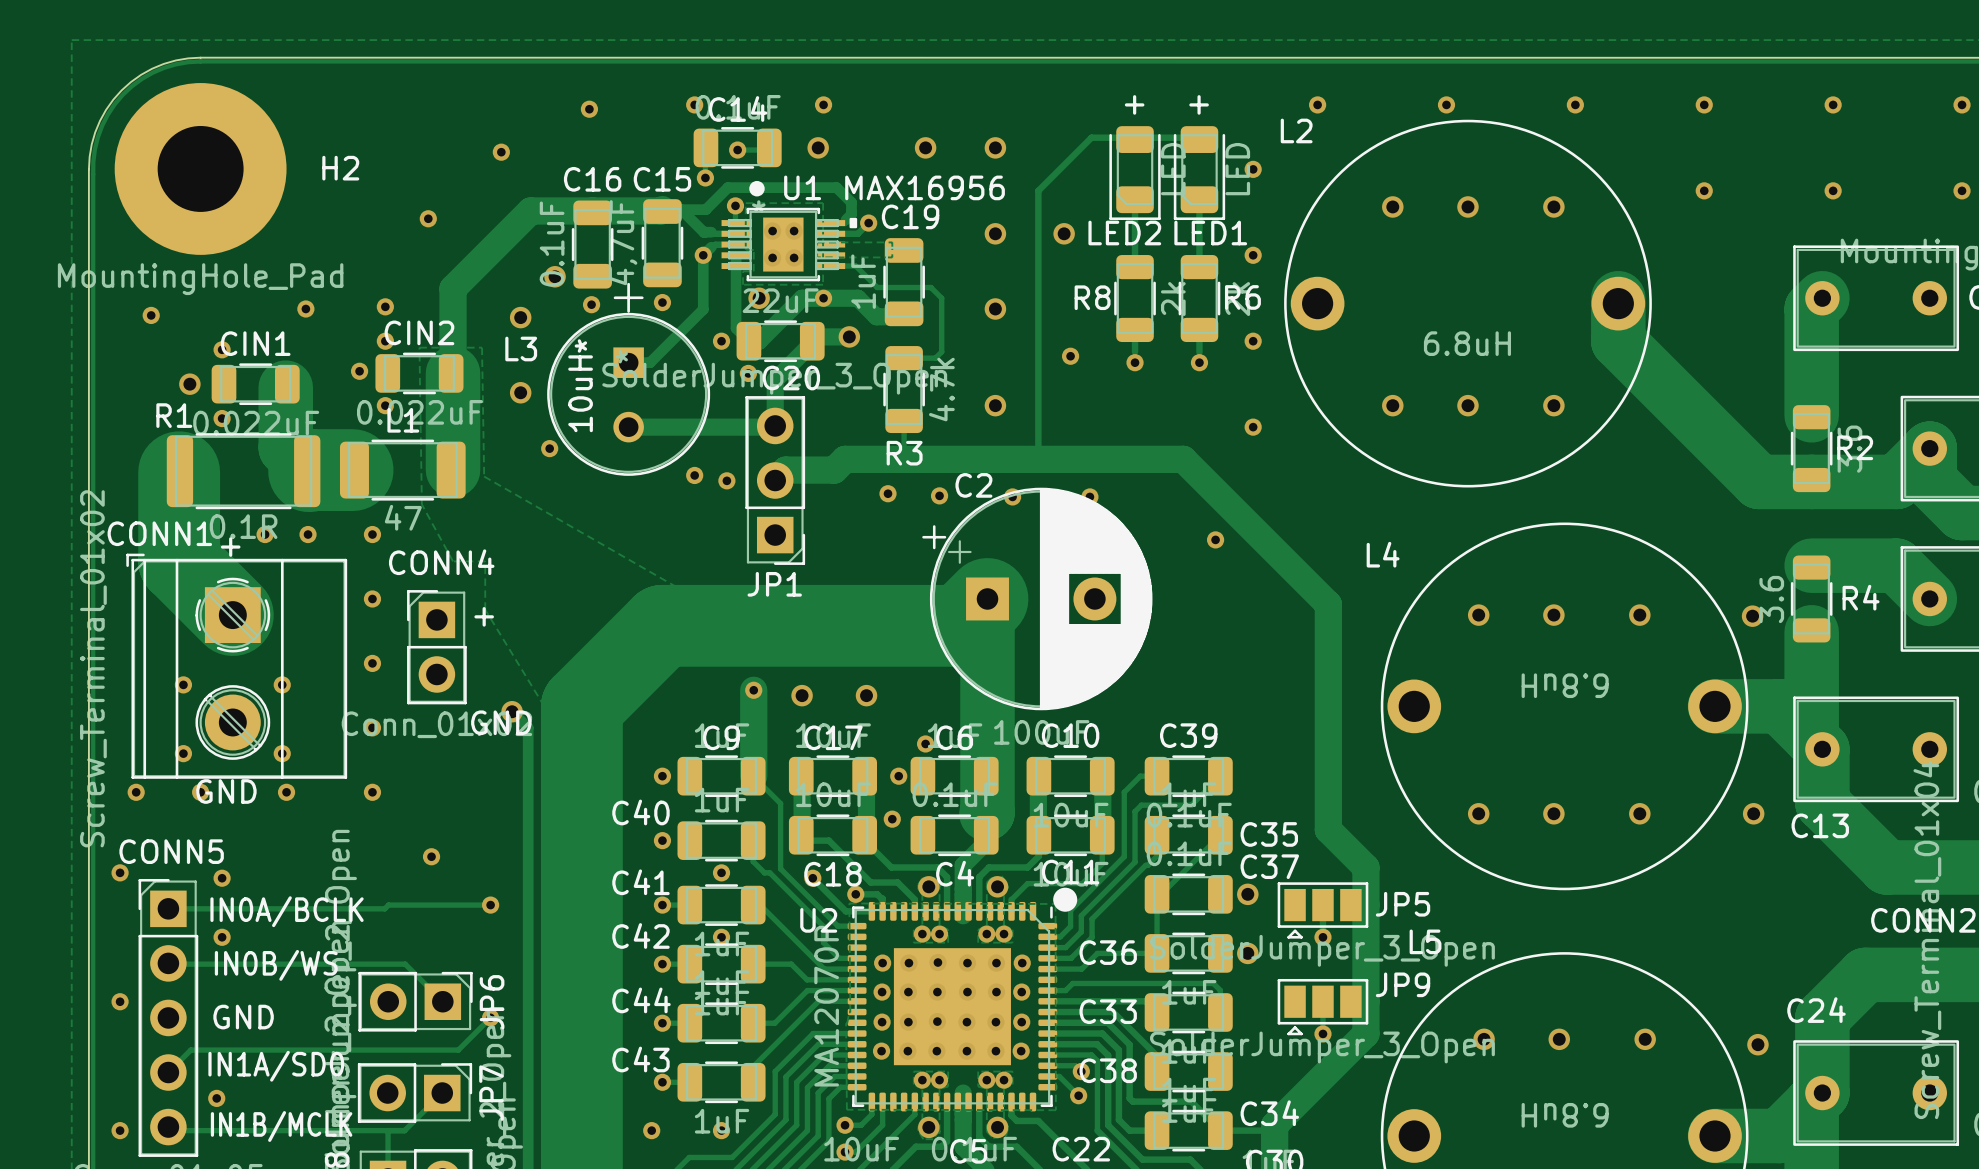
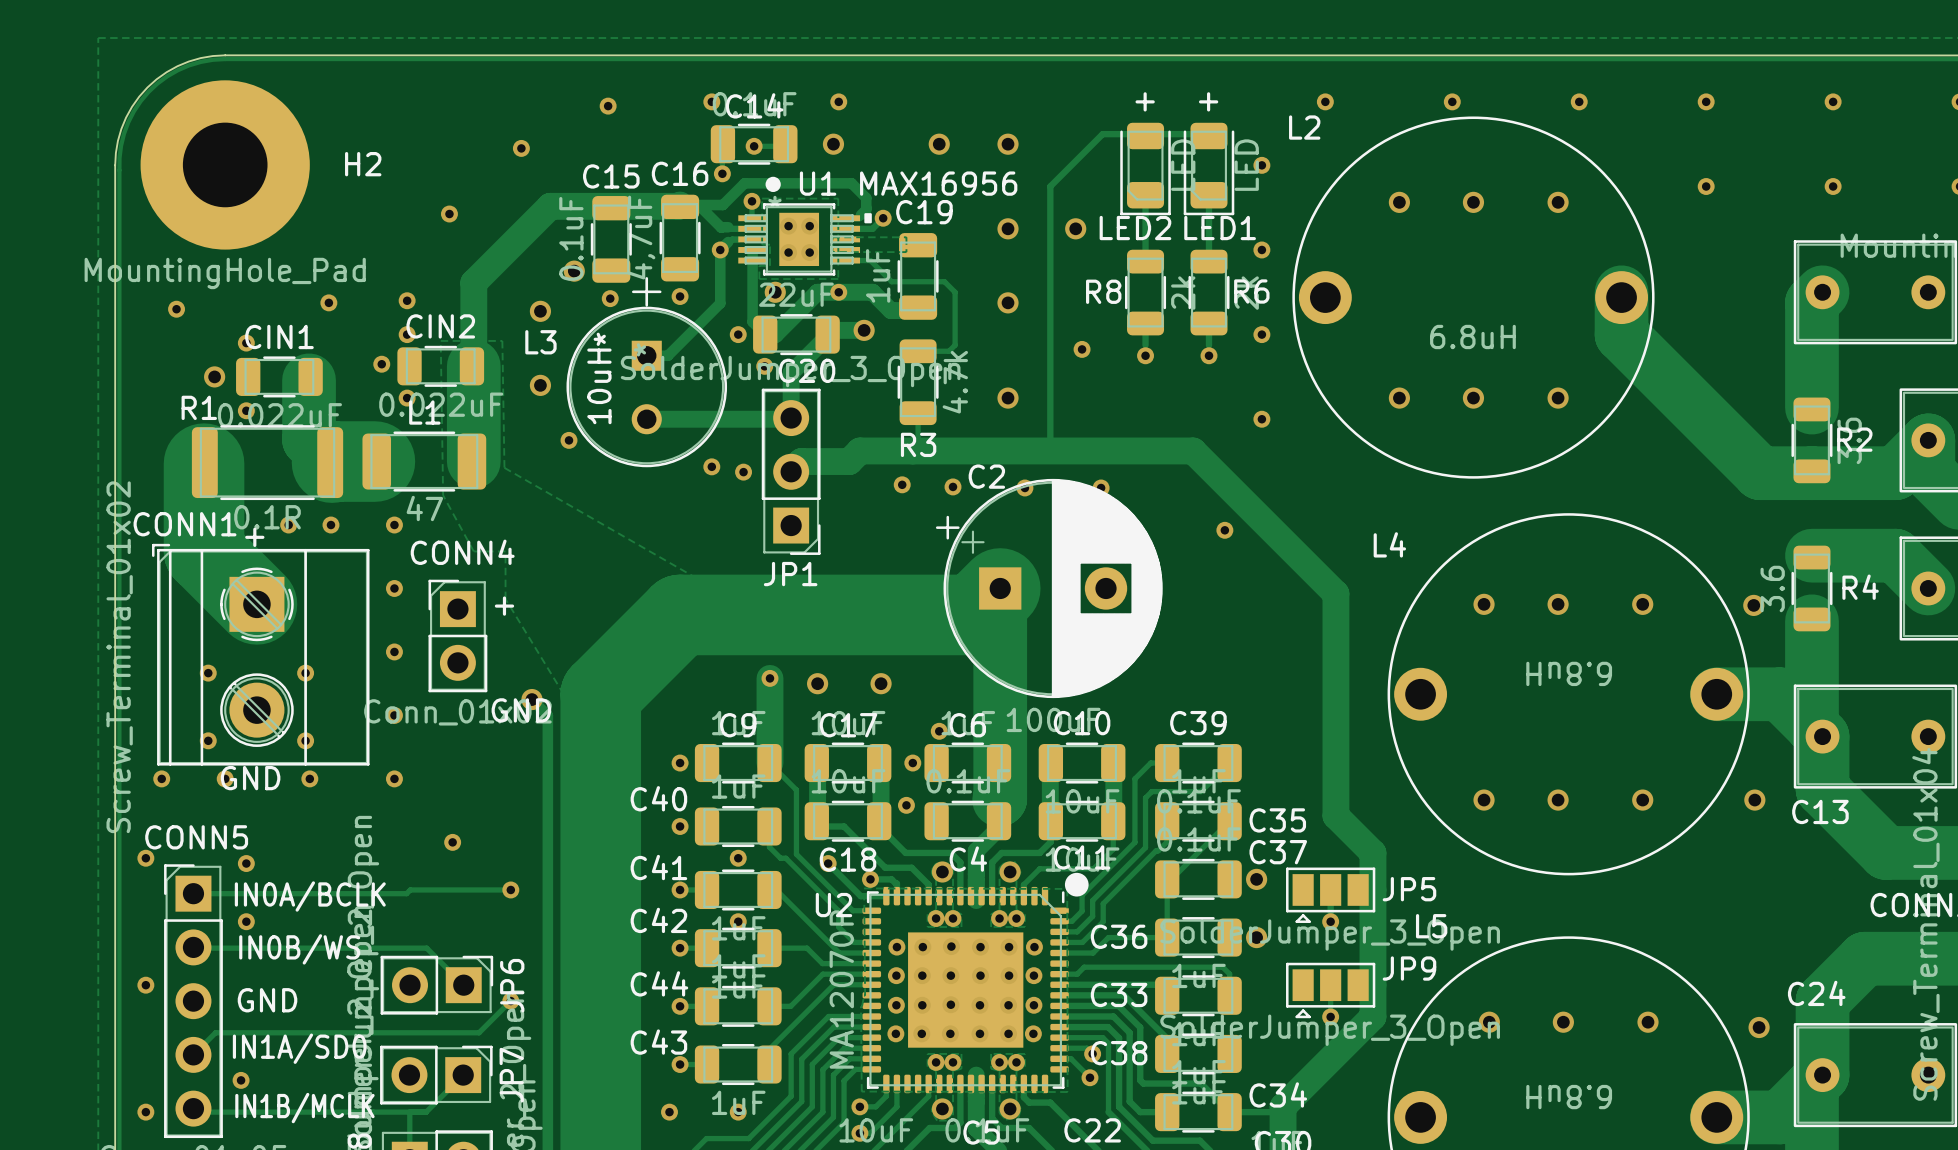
C16 name: C16 (592, 179) -> C15 (611, 176)
C15 name: C15 (662, 179) -> C16 (680, 173)

